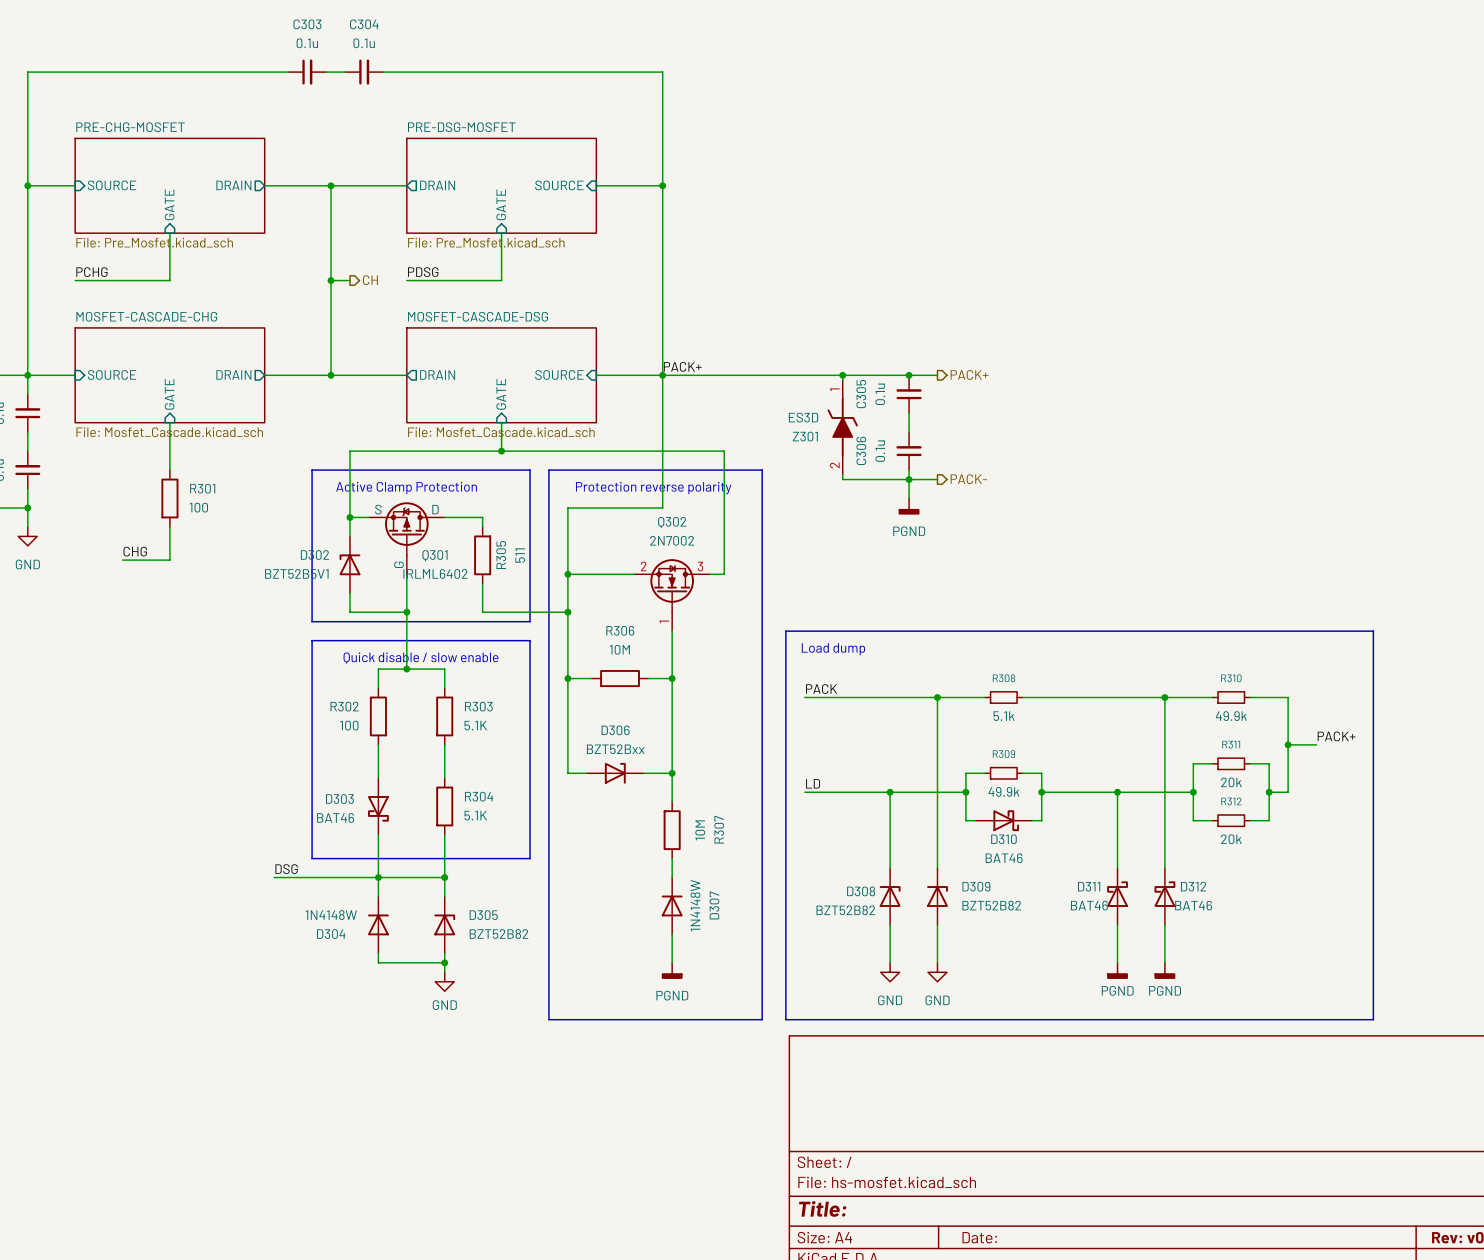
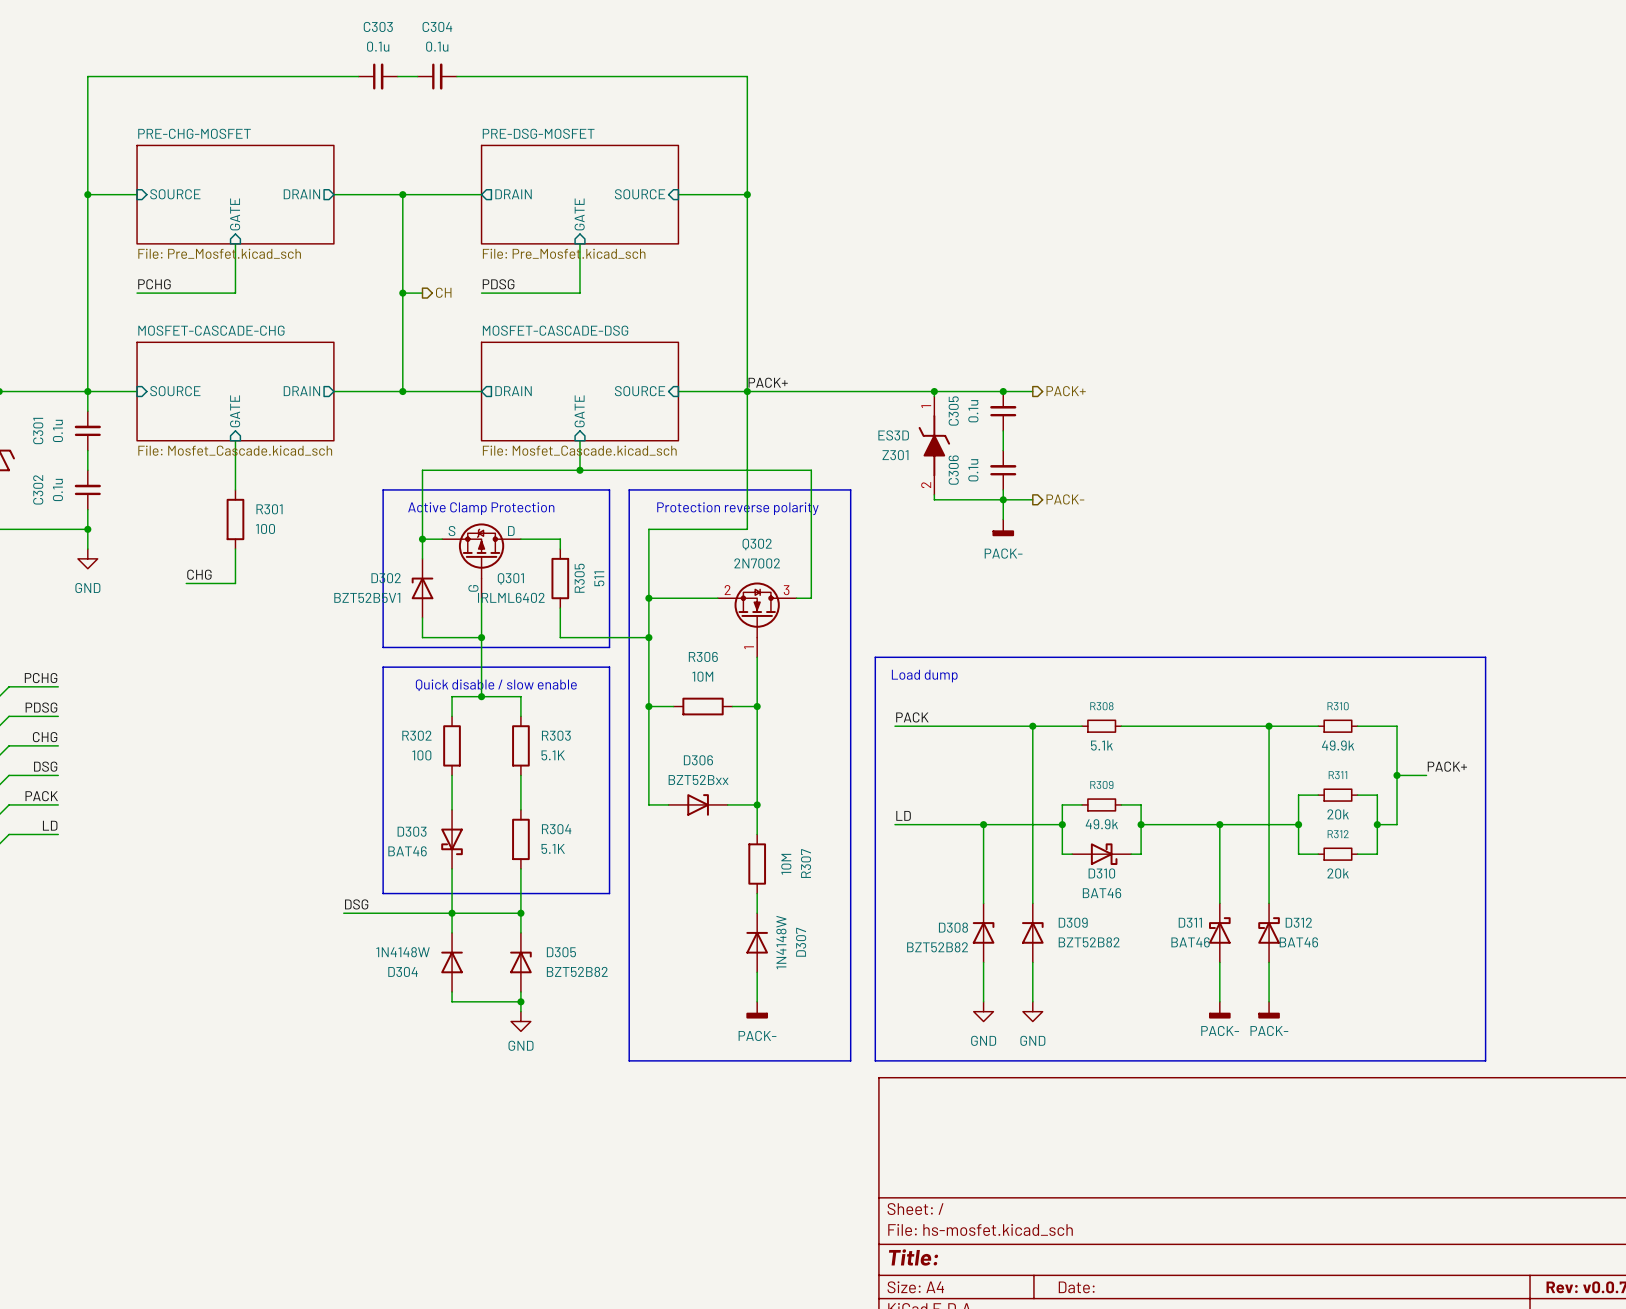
power symbol: PGND (909, 506) -> PACK- (1003, 527)
power symbol: PGND (672, 970) -> PACK- (757, 1010)
power symbol: PGND (1117, 970) -> PACK- (1219, 1010)
power symbol: PGND (1164, 970) -> PACK- (1269, 1010)

